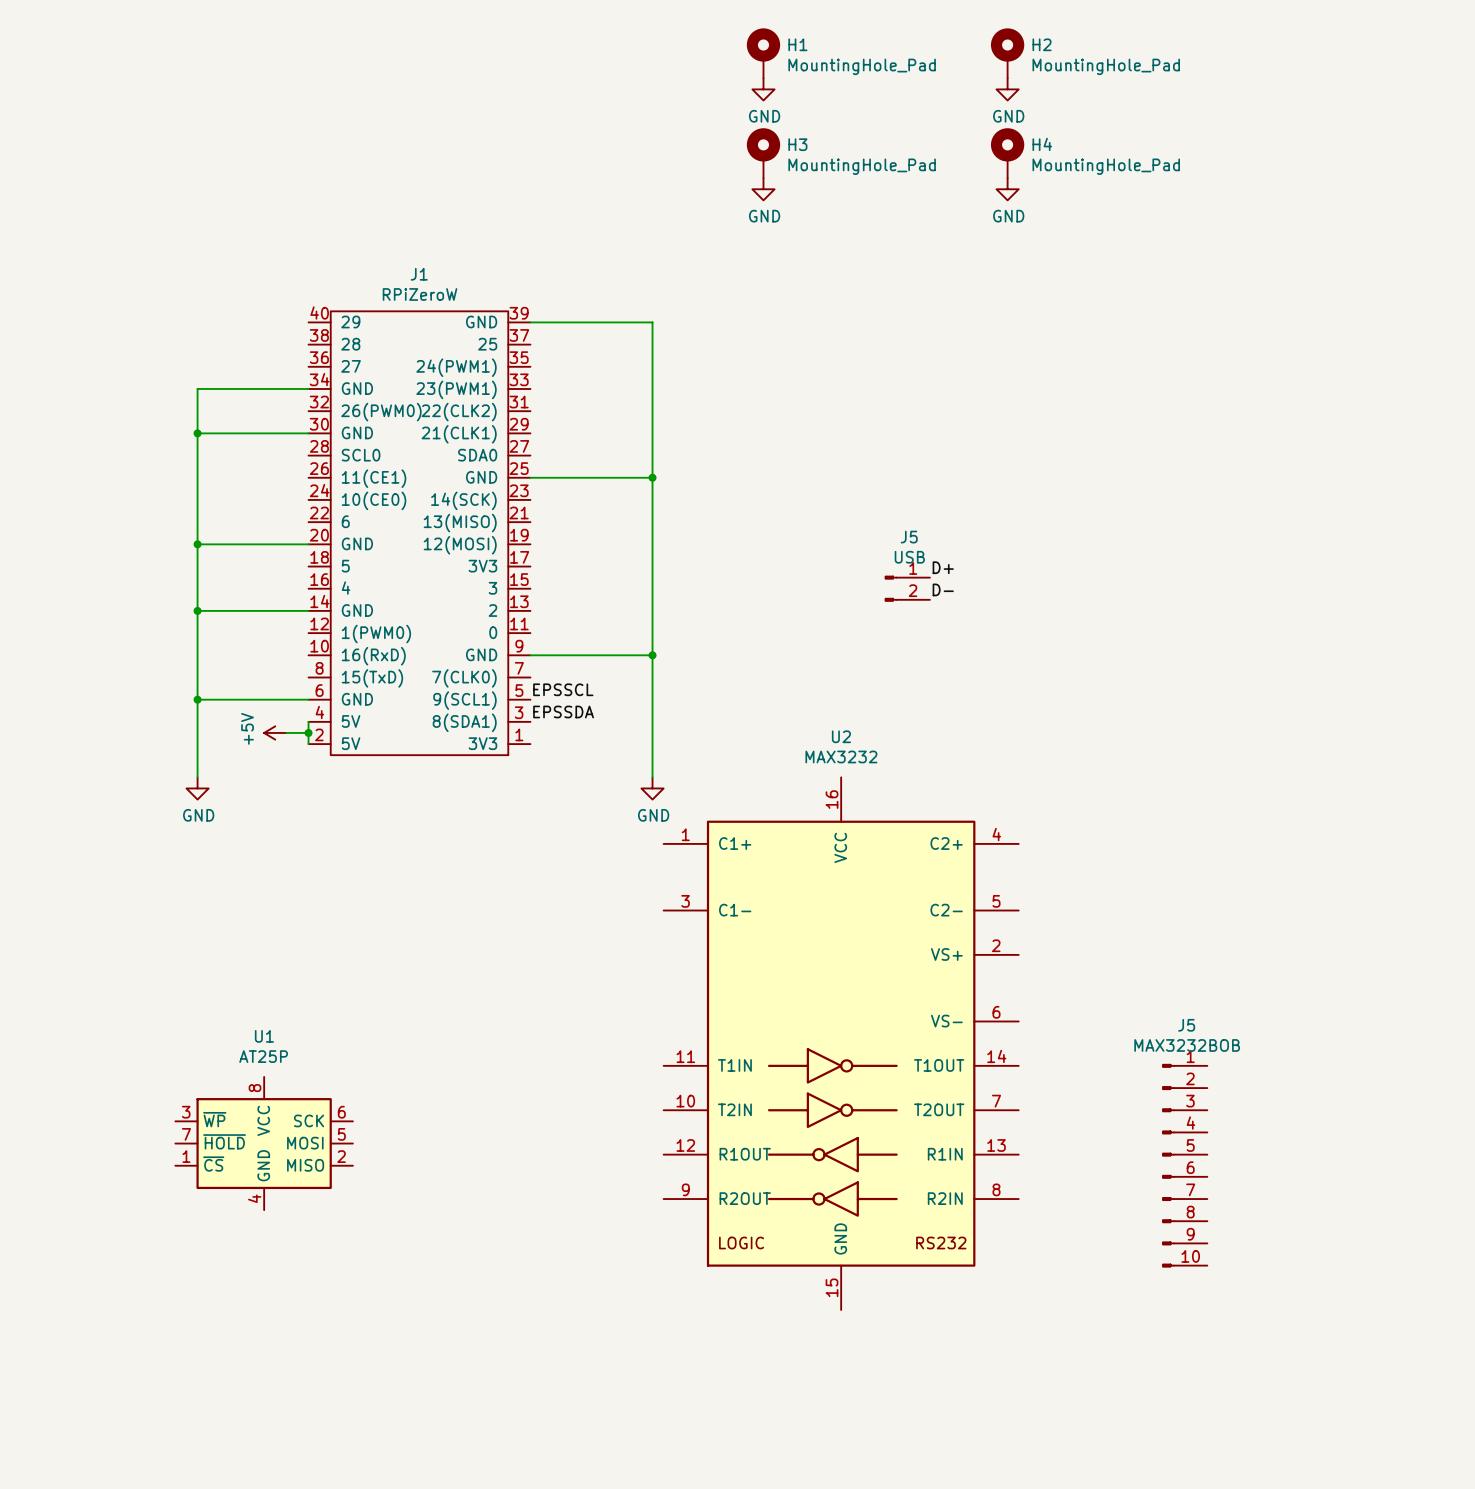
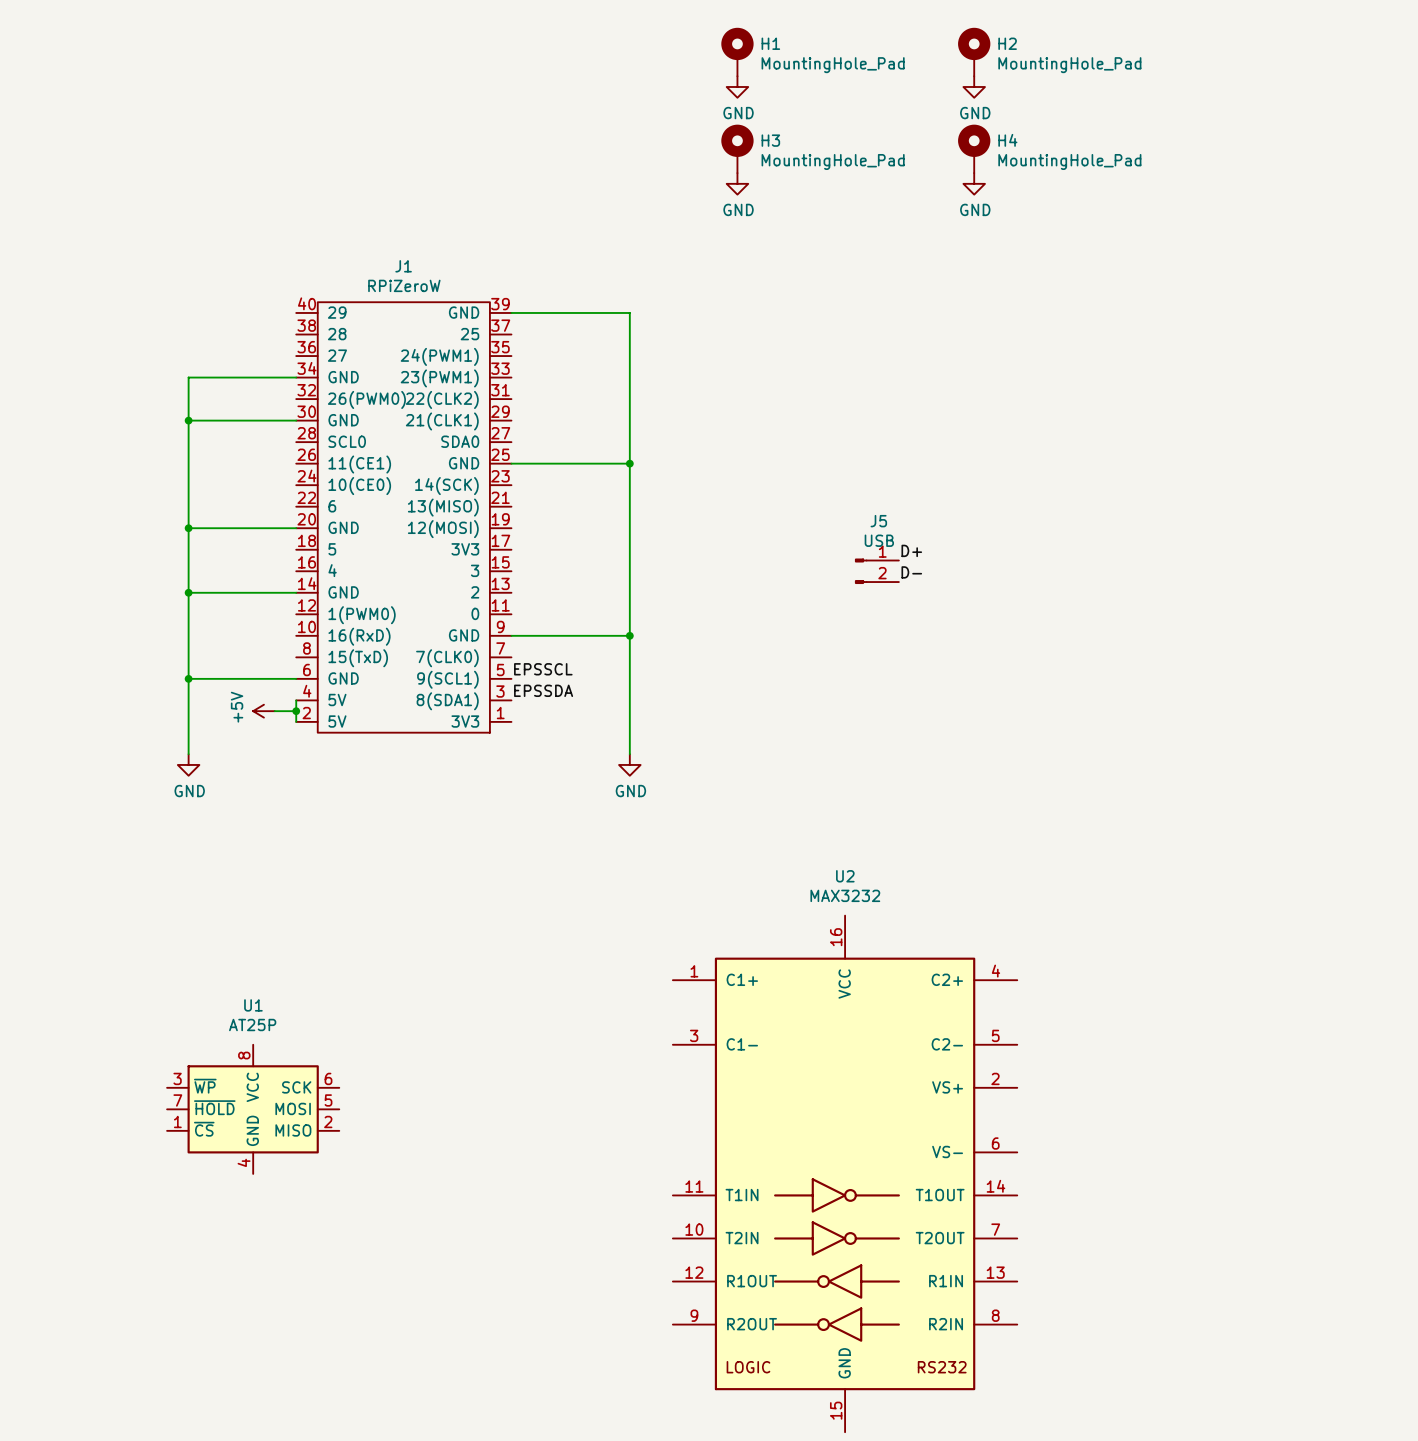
U2 position: (841, 1043) -> (845, 1173)
J5: MAX3232BOB (1184, 1165) -> none

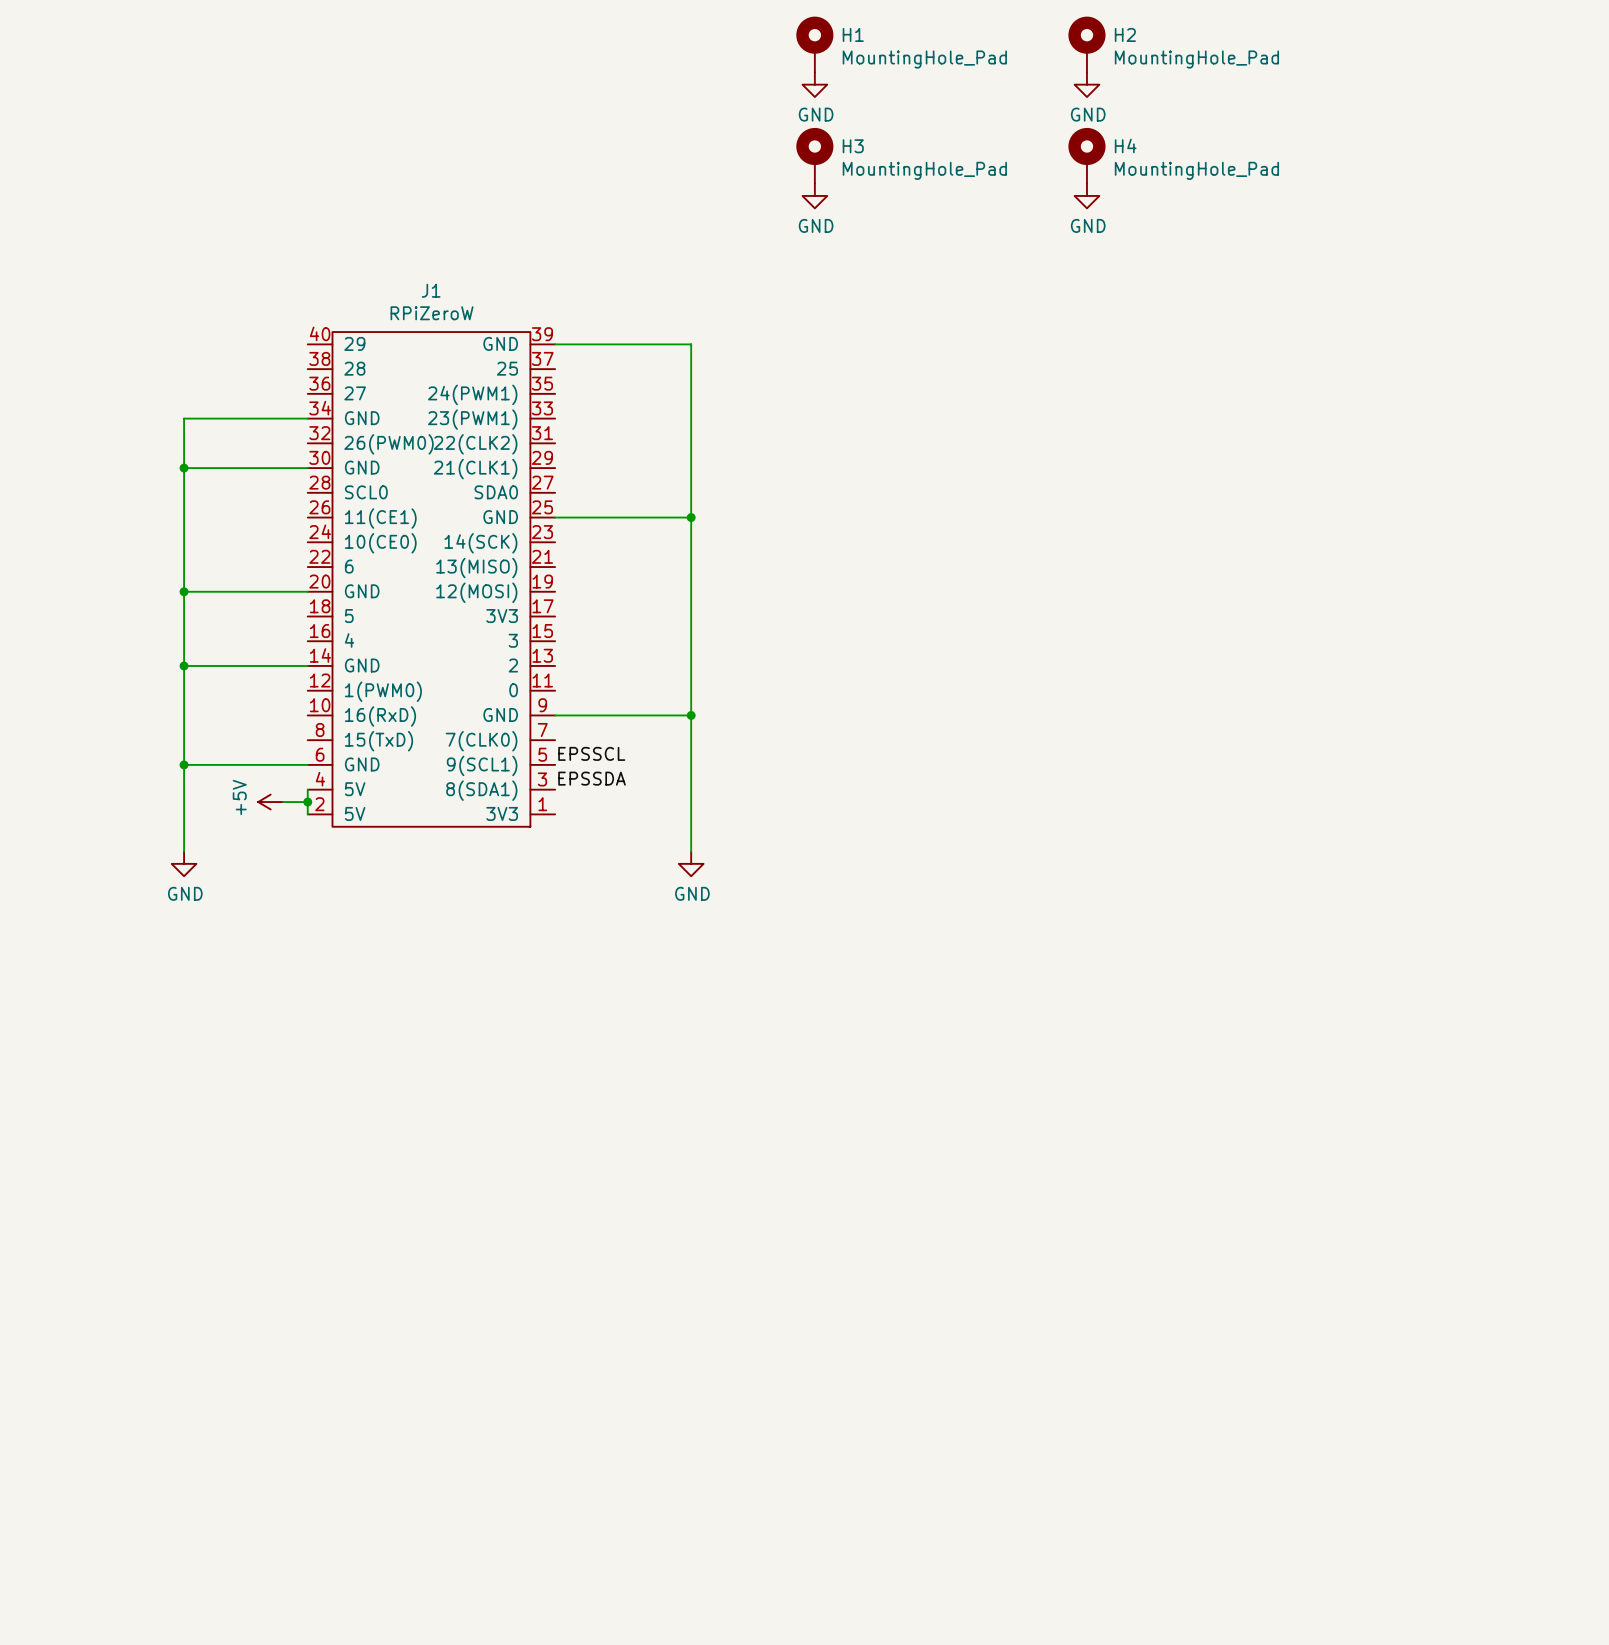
label: D+ (911, 550) -> none
J5: USB (877, 571) -> none
label: D- (911, 572) -> none
U1: AT25P (253, 1109) -> none
U2: MAX3232 (845, 1173) -> none

